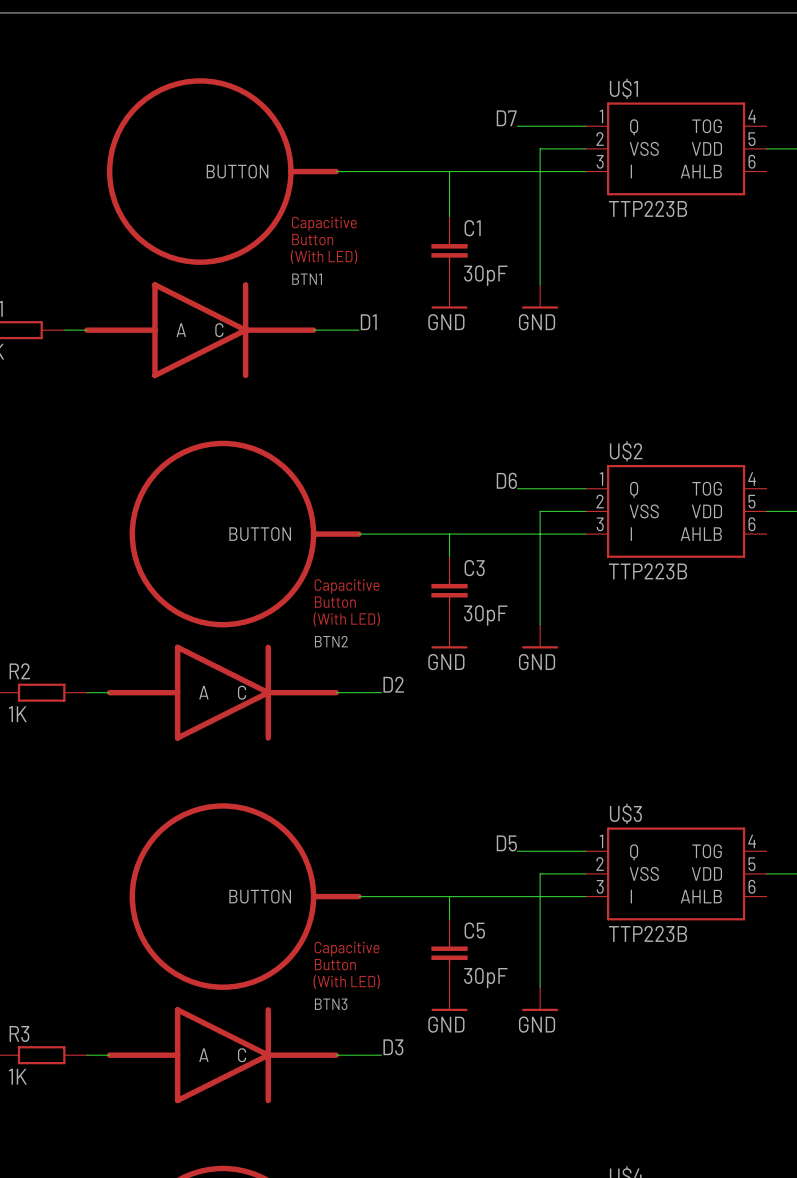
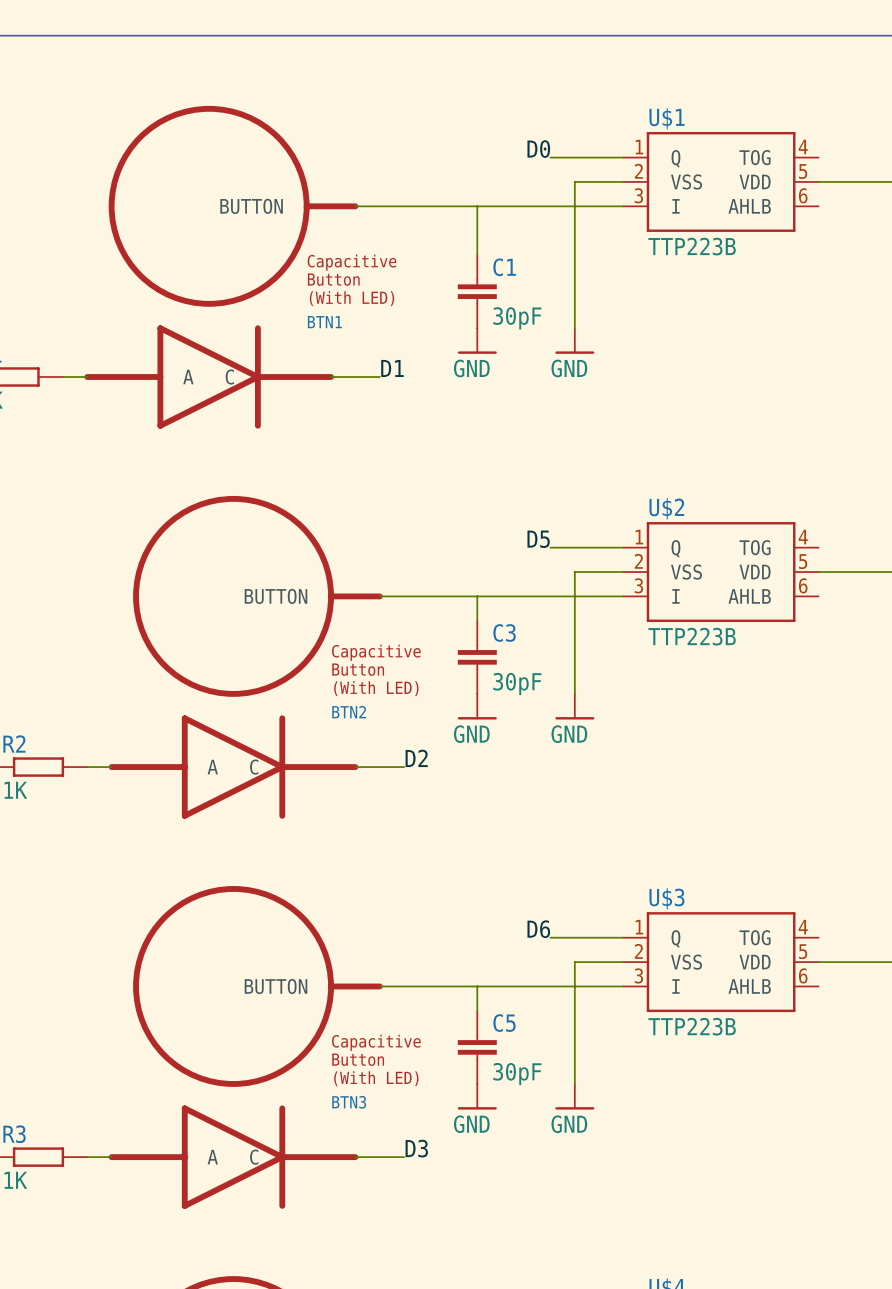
label: D7 (506, 118) -> D0 (538, 149)
label: D6 (506, 480) -> D5 (538, 539)
label: D5 (506, 843) -> D6 (538, 929)

